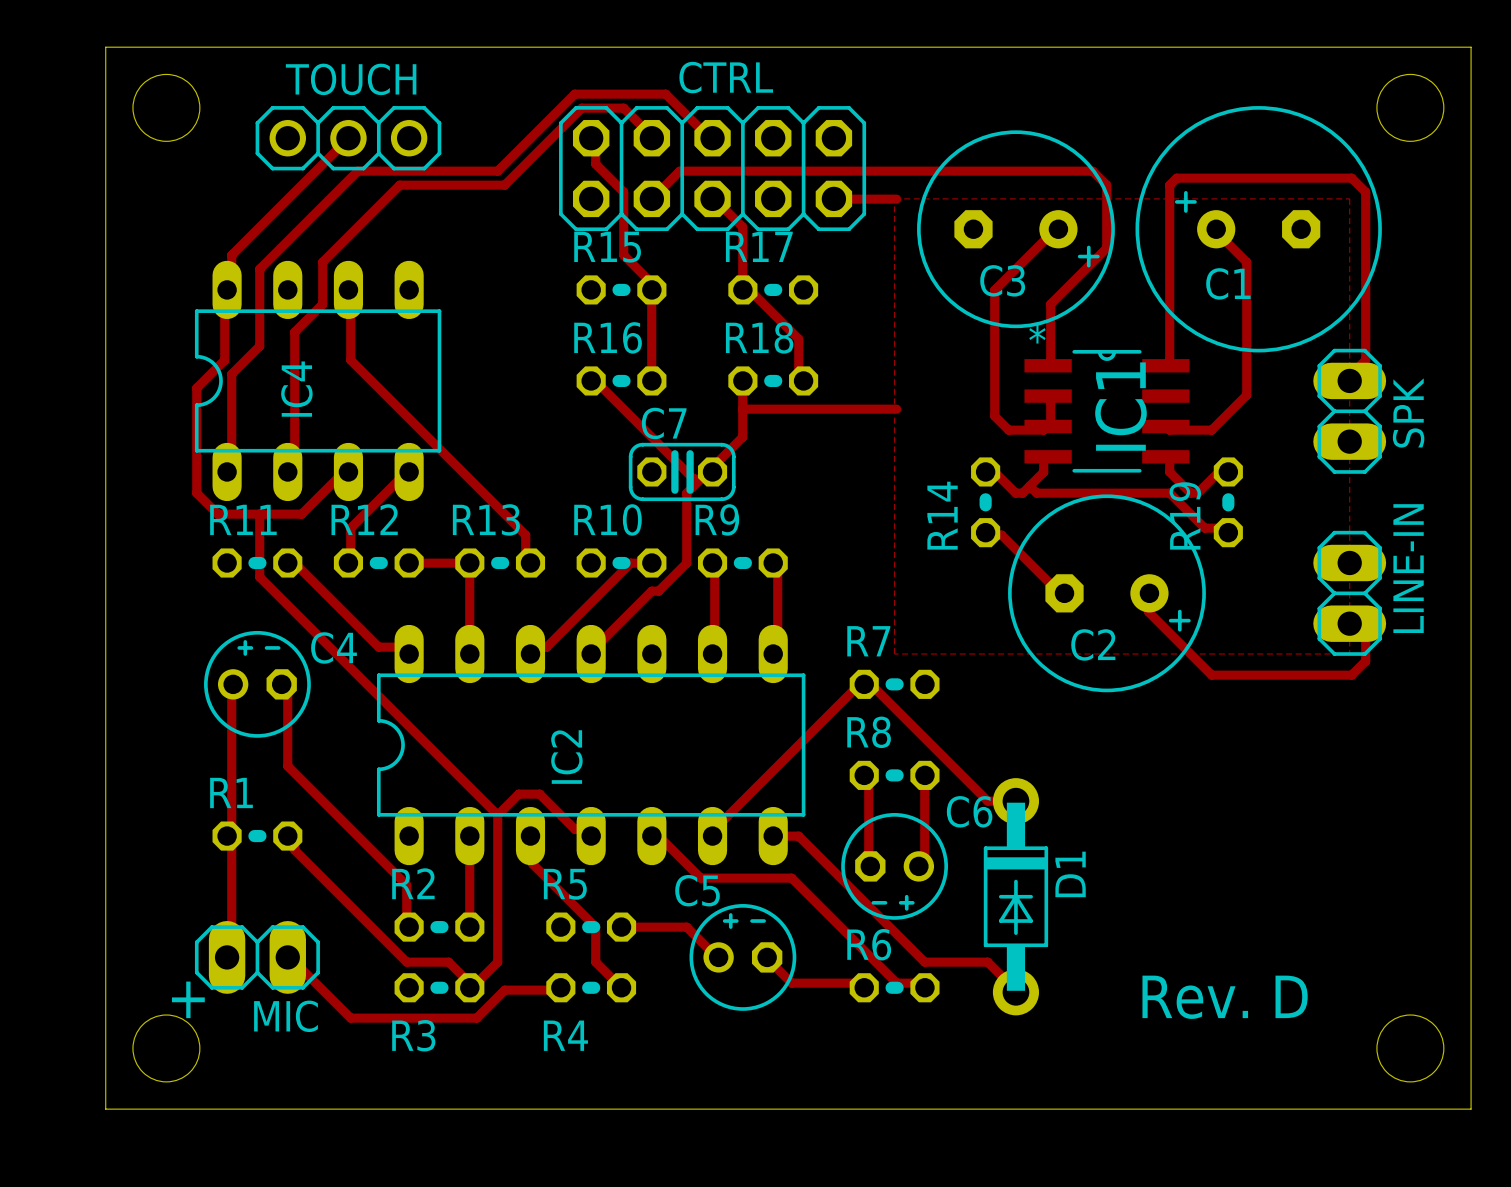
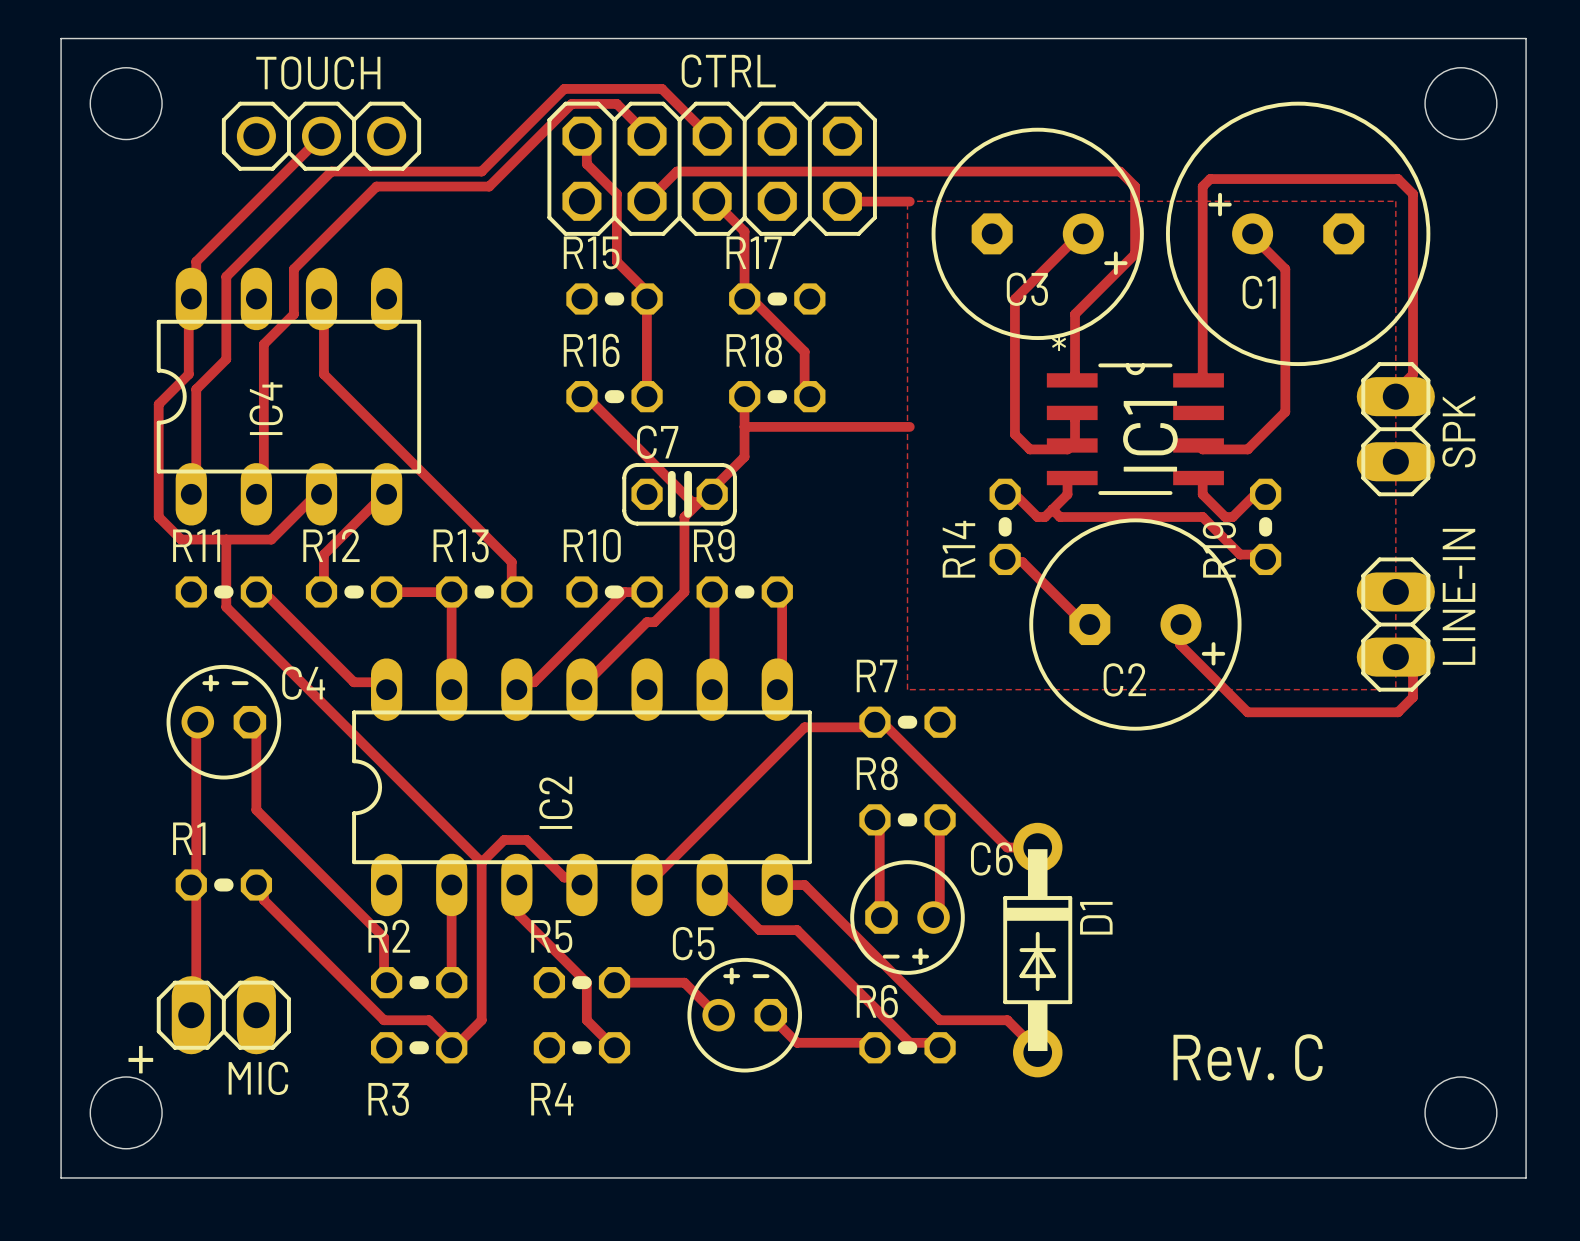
track: (864, 684) (861, 682) (714, 829) (712, 836) -> (874, 722) (872, 727) (804, 727) (647, 884)
track: (651, 836) (658, 836) (700, 878) (756, 878) -> (712, 884) (714, 885) (759, 930)
track: (287, 957) (350, 1018) (476, 1018) (504, 990) (560, 990) (560, 987) -> none
text: Rev. D (1225, 997) -> Rev. C (1248, 1057)

